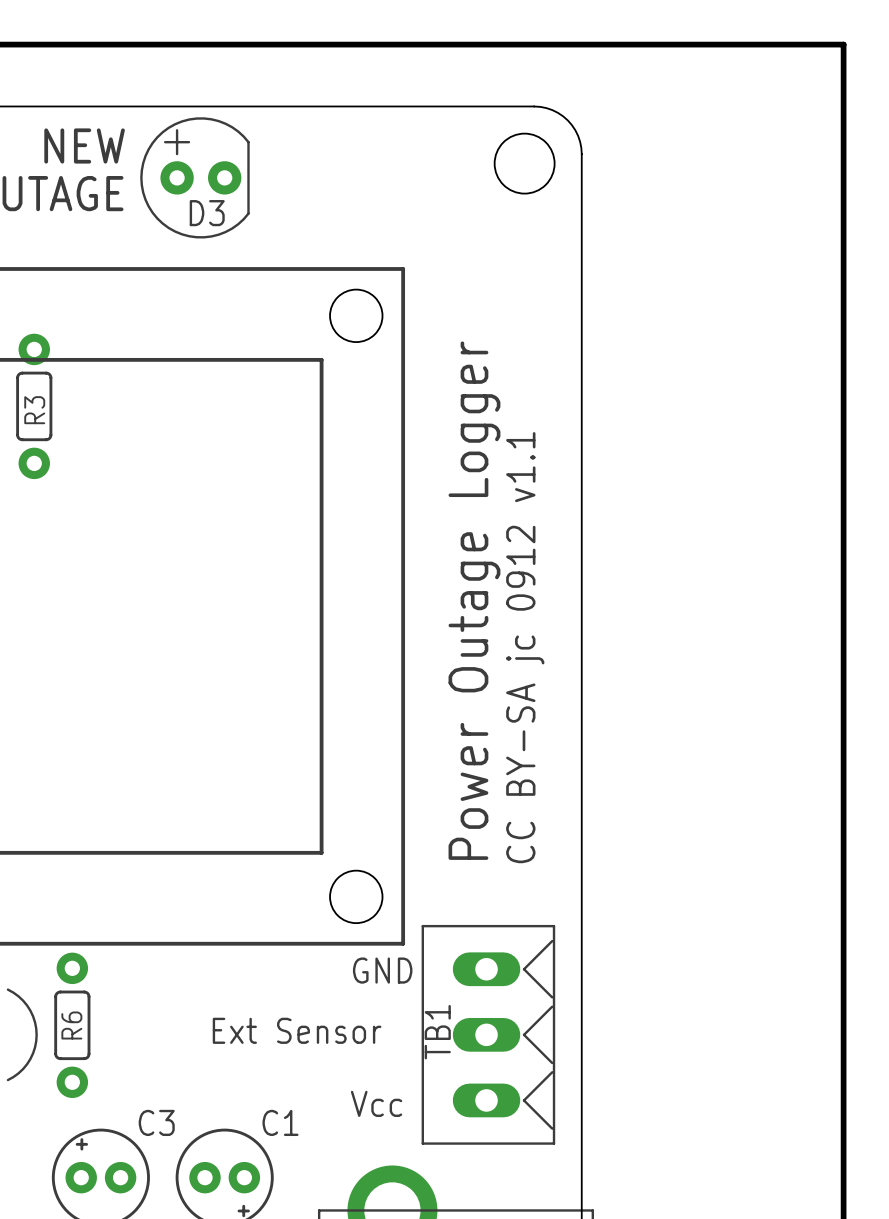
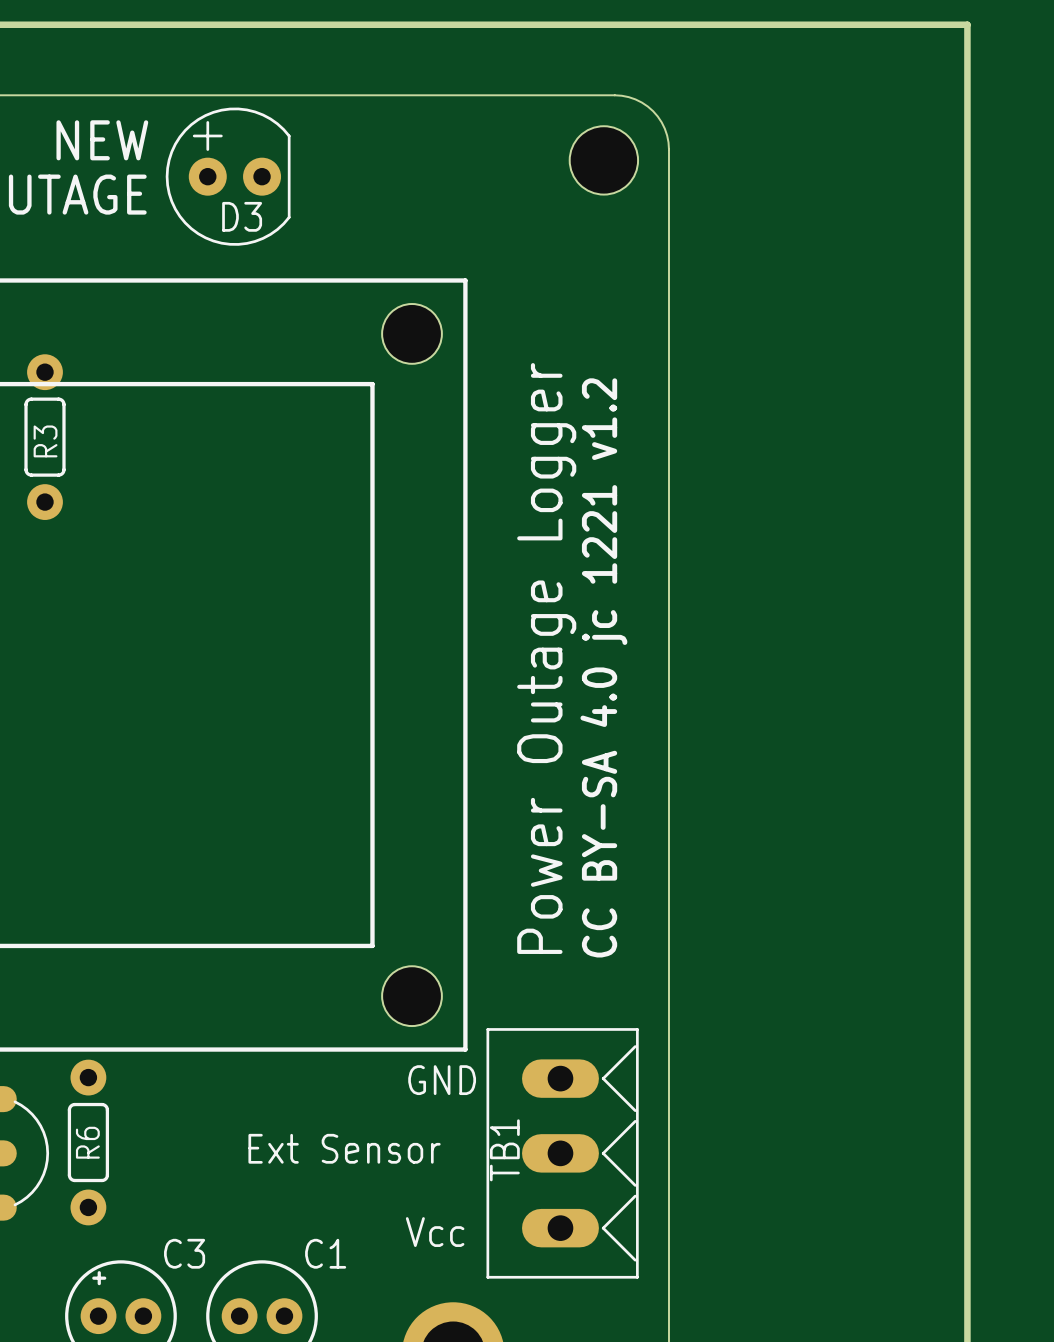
text: CC BY-SA jc 0912 v1.1 (525, 647) -> CC BY-SA 4.0 jc 1221 v1.2 (603, 667)

